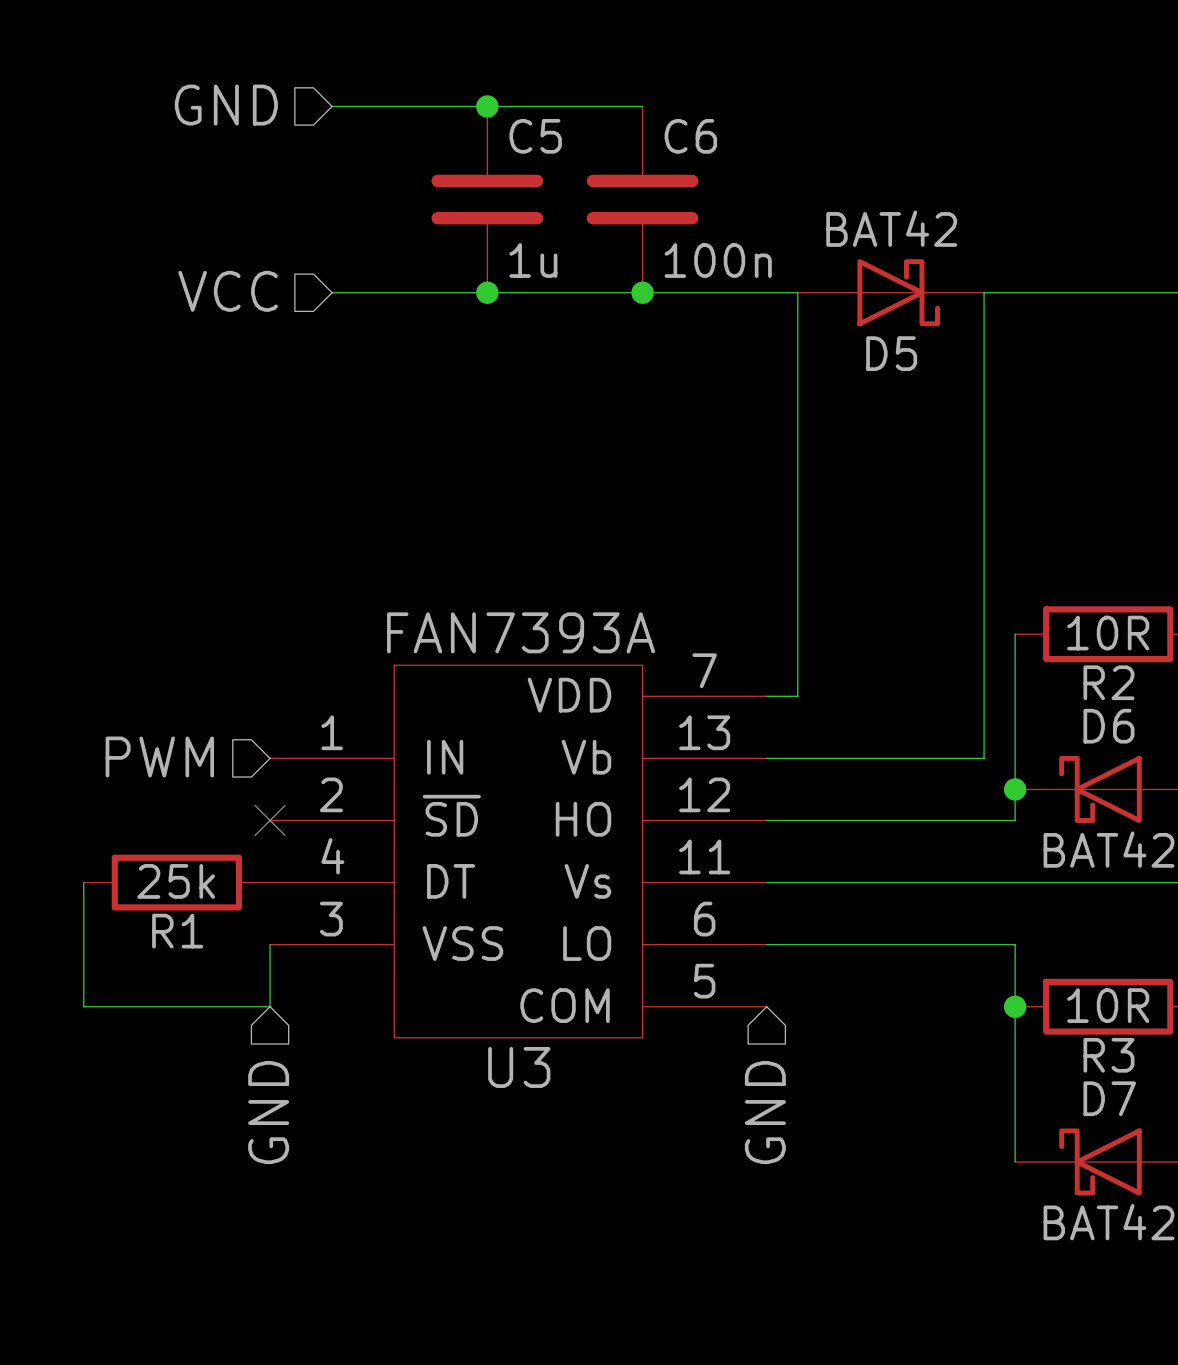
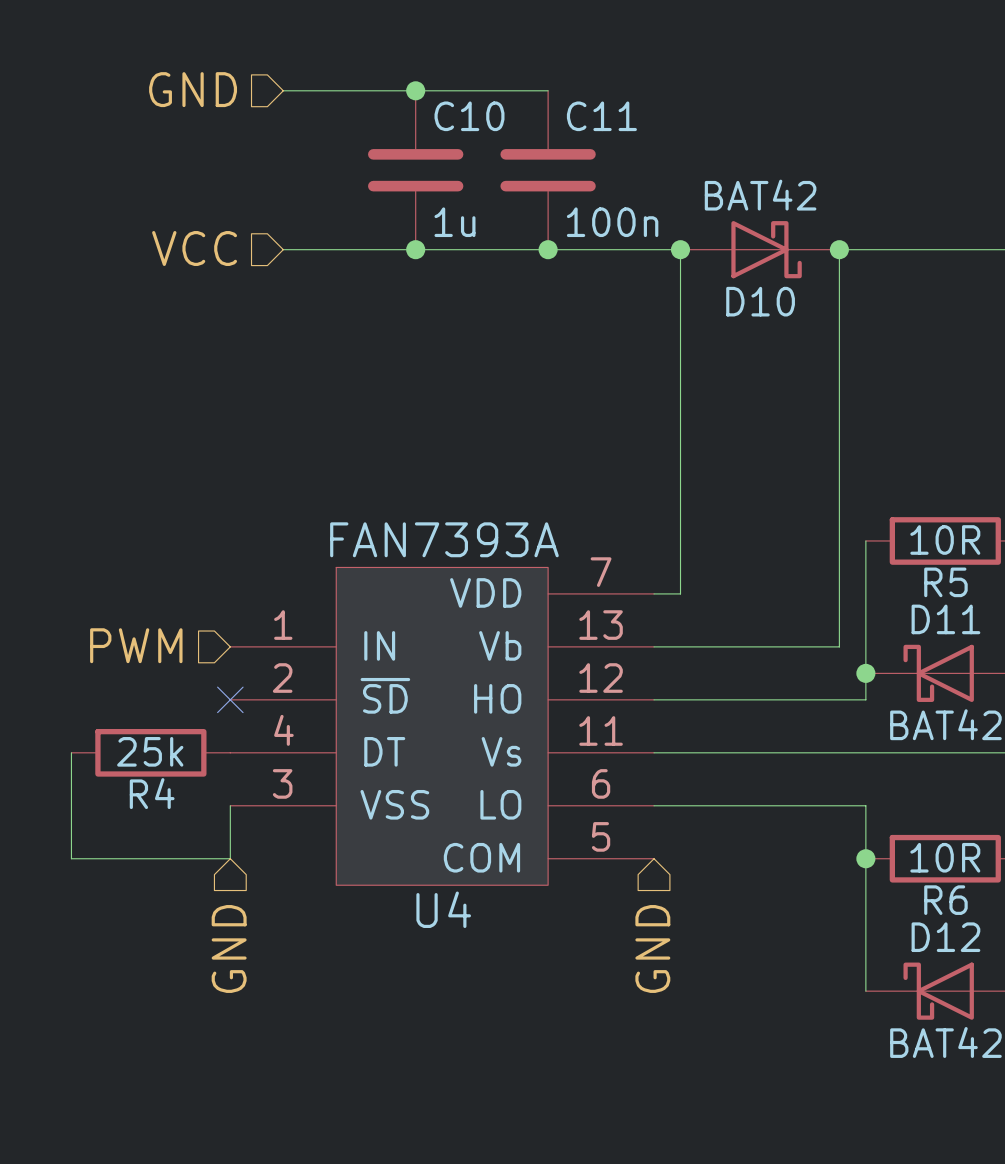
C5 name: C5 (535, 136) -> C10 (469, 116)
C6 name: C6 (690, 136) -> C11 (601, 116)
junction: none -> (680, 249)
junction: none -> (839, 249)
D5 name: D5 (891, 353) -> D10 (760, 301)
R2 name: R2 (1108, 682) -> R5 (945, 582)
D6 name: D6 (1108, 726) -> D11 (945, 619)
R1 name: R1 (177, 931) -> R4 (152, 793)
R3 name: R3 (1108, 1055) -> R6 (945, 900)
U3 name: U3 (519, 1067) -> U4 (443, 909)
D7 name: D7 (1109, 1098) -> D12 (945, 937)

